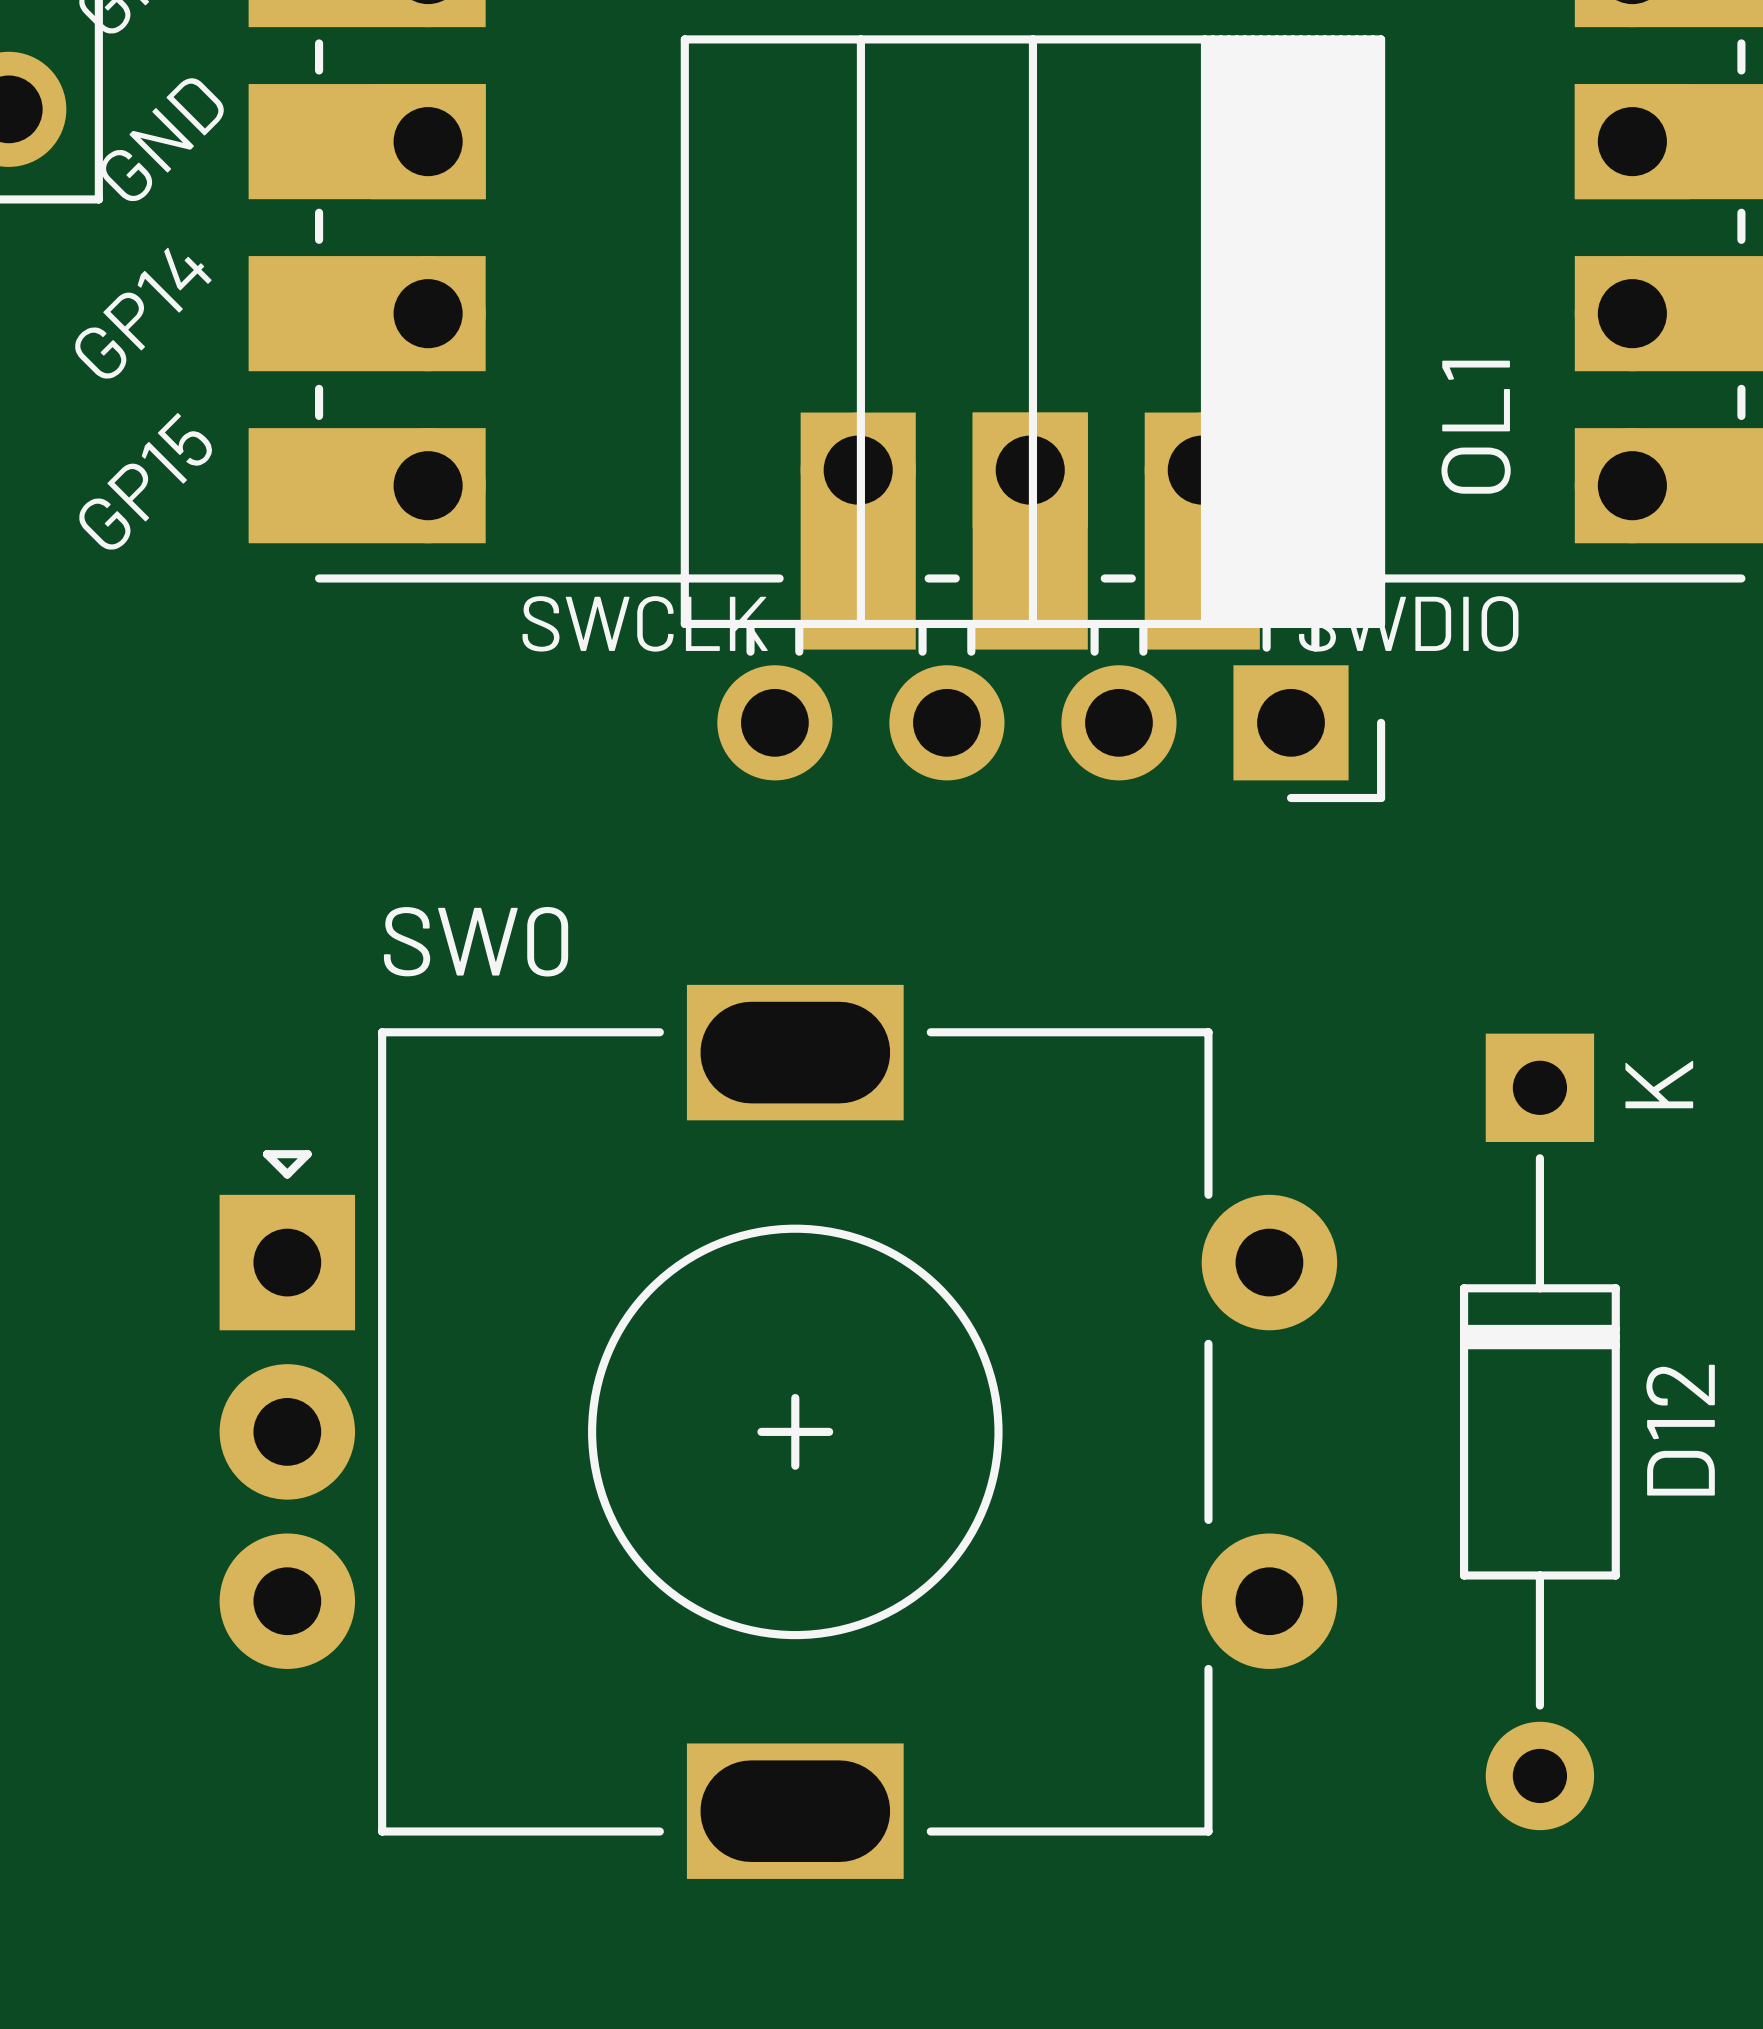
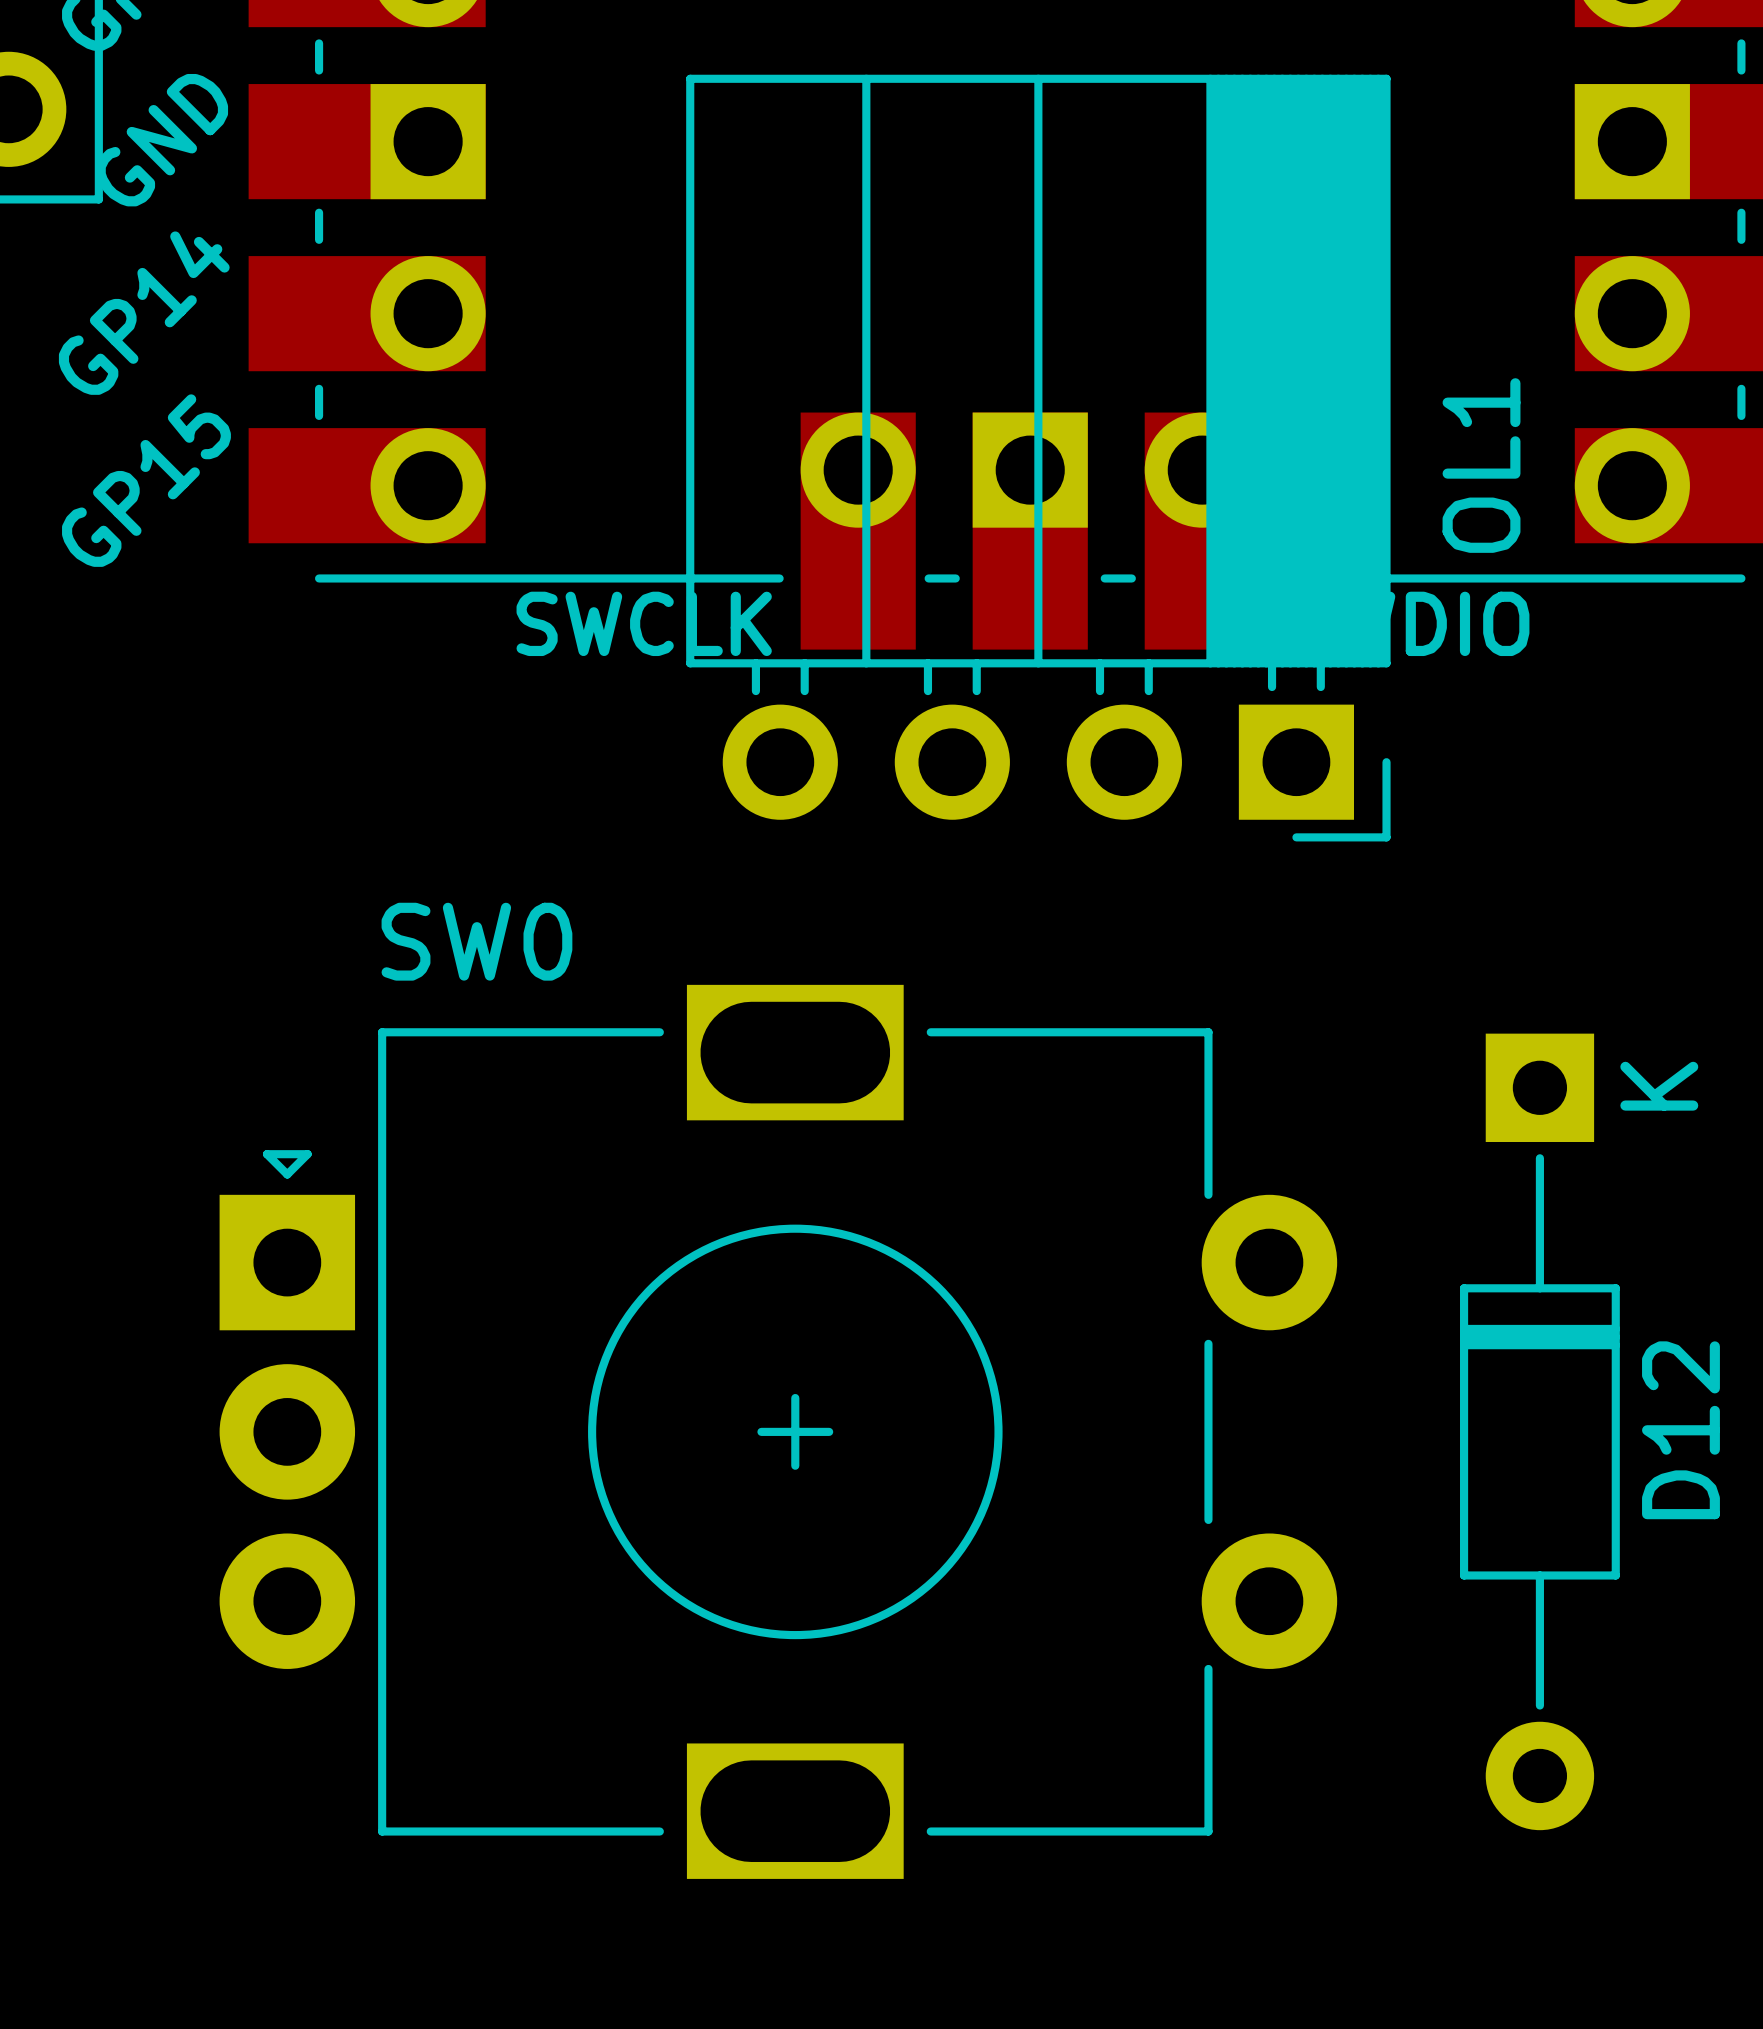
OL1 position: (1032, 418) -> (1038, 458)

